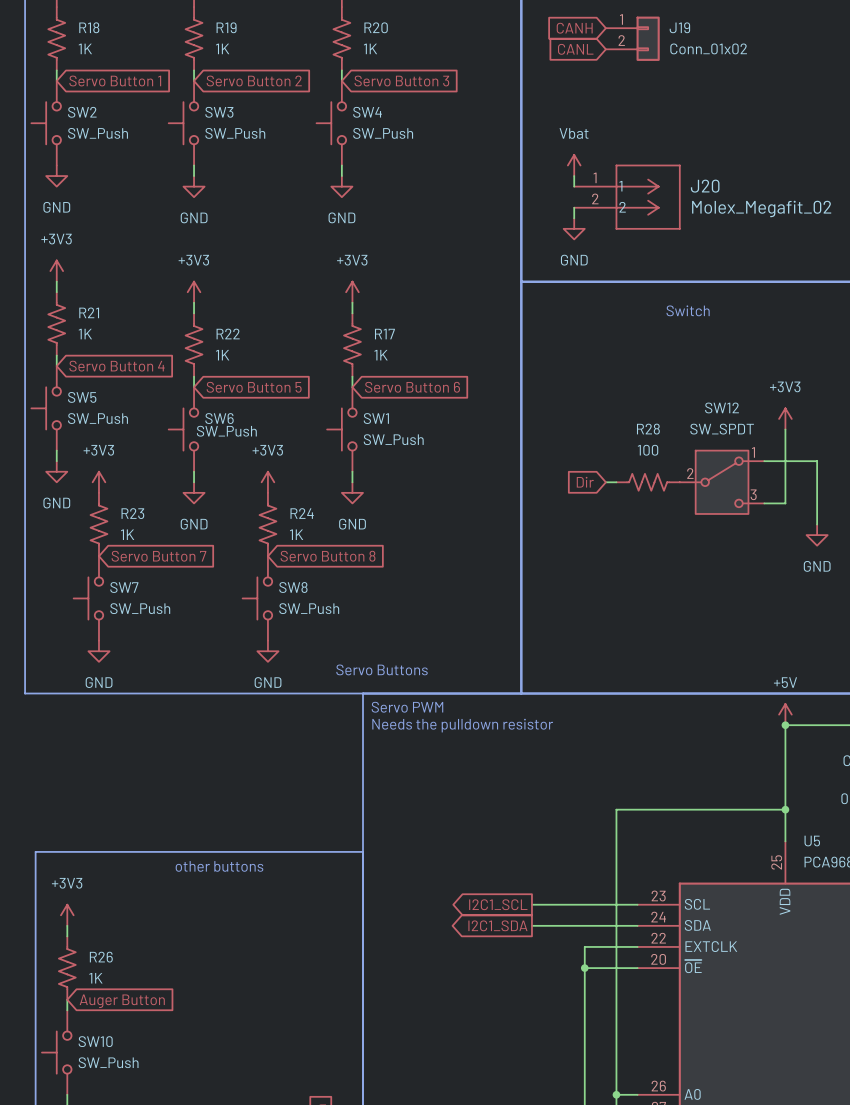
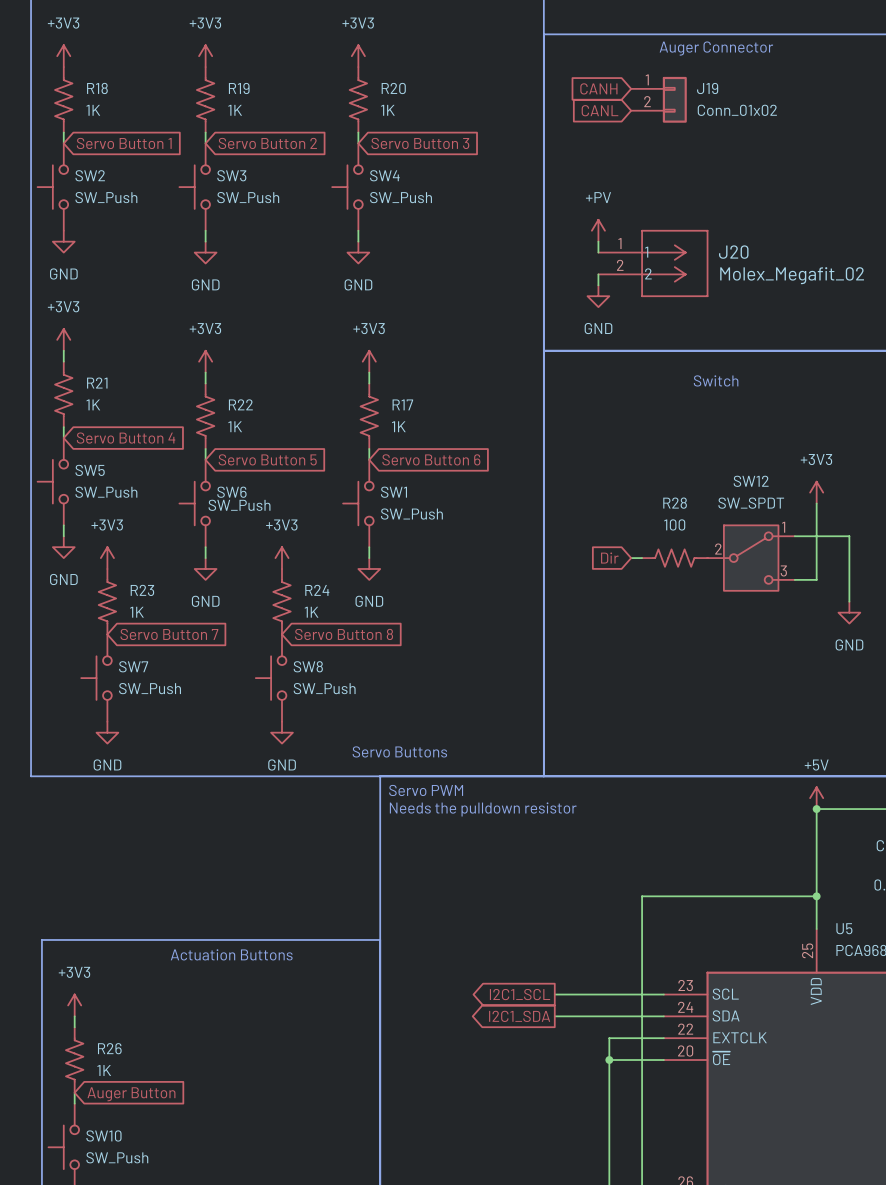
power symbol: Vbat (574, 165) -> +PV (598, 230)
text: other buttons (219, 866) -> Actuation Buttons (231, 954)

